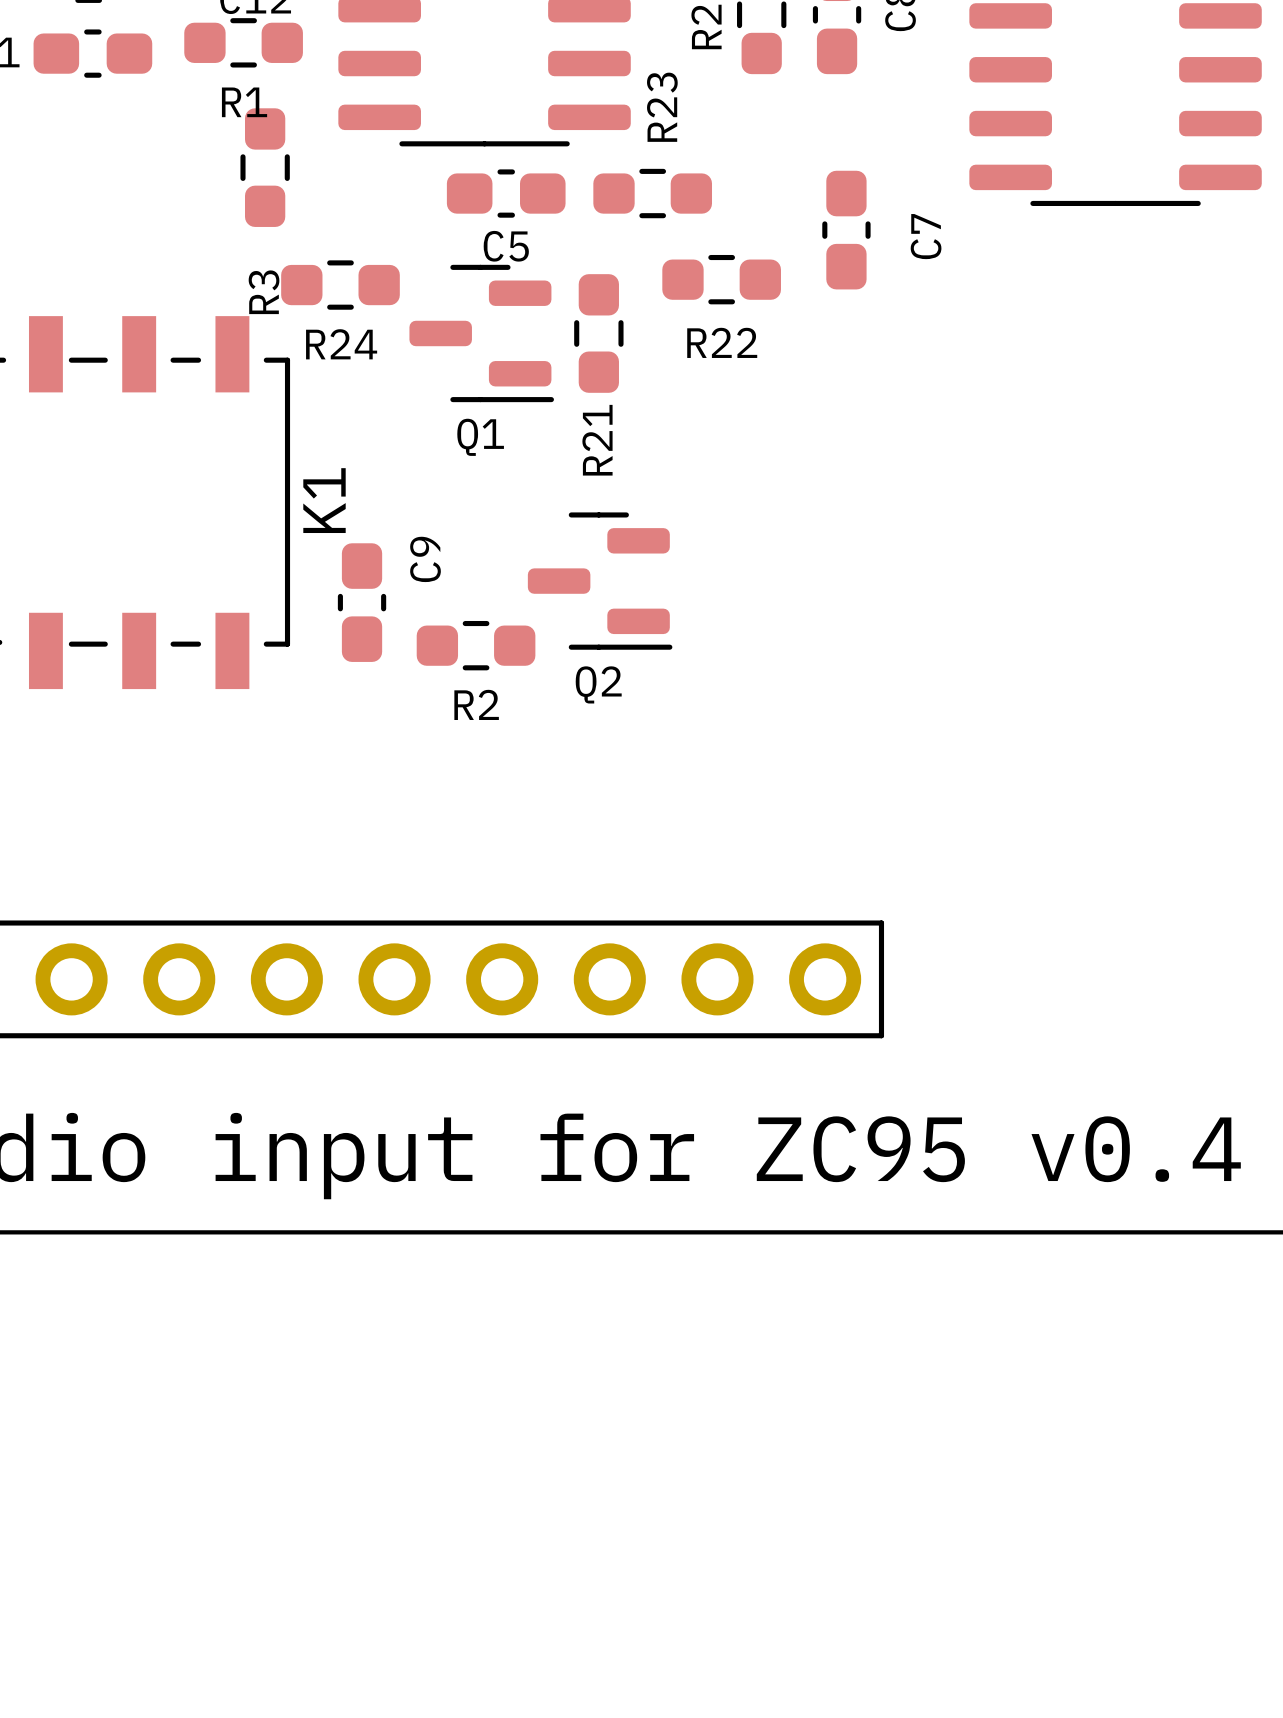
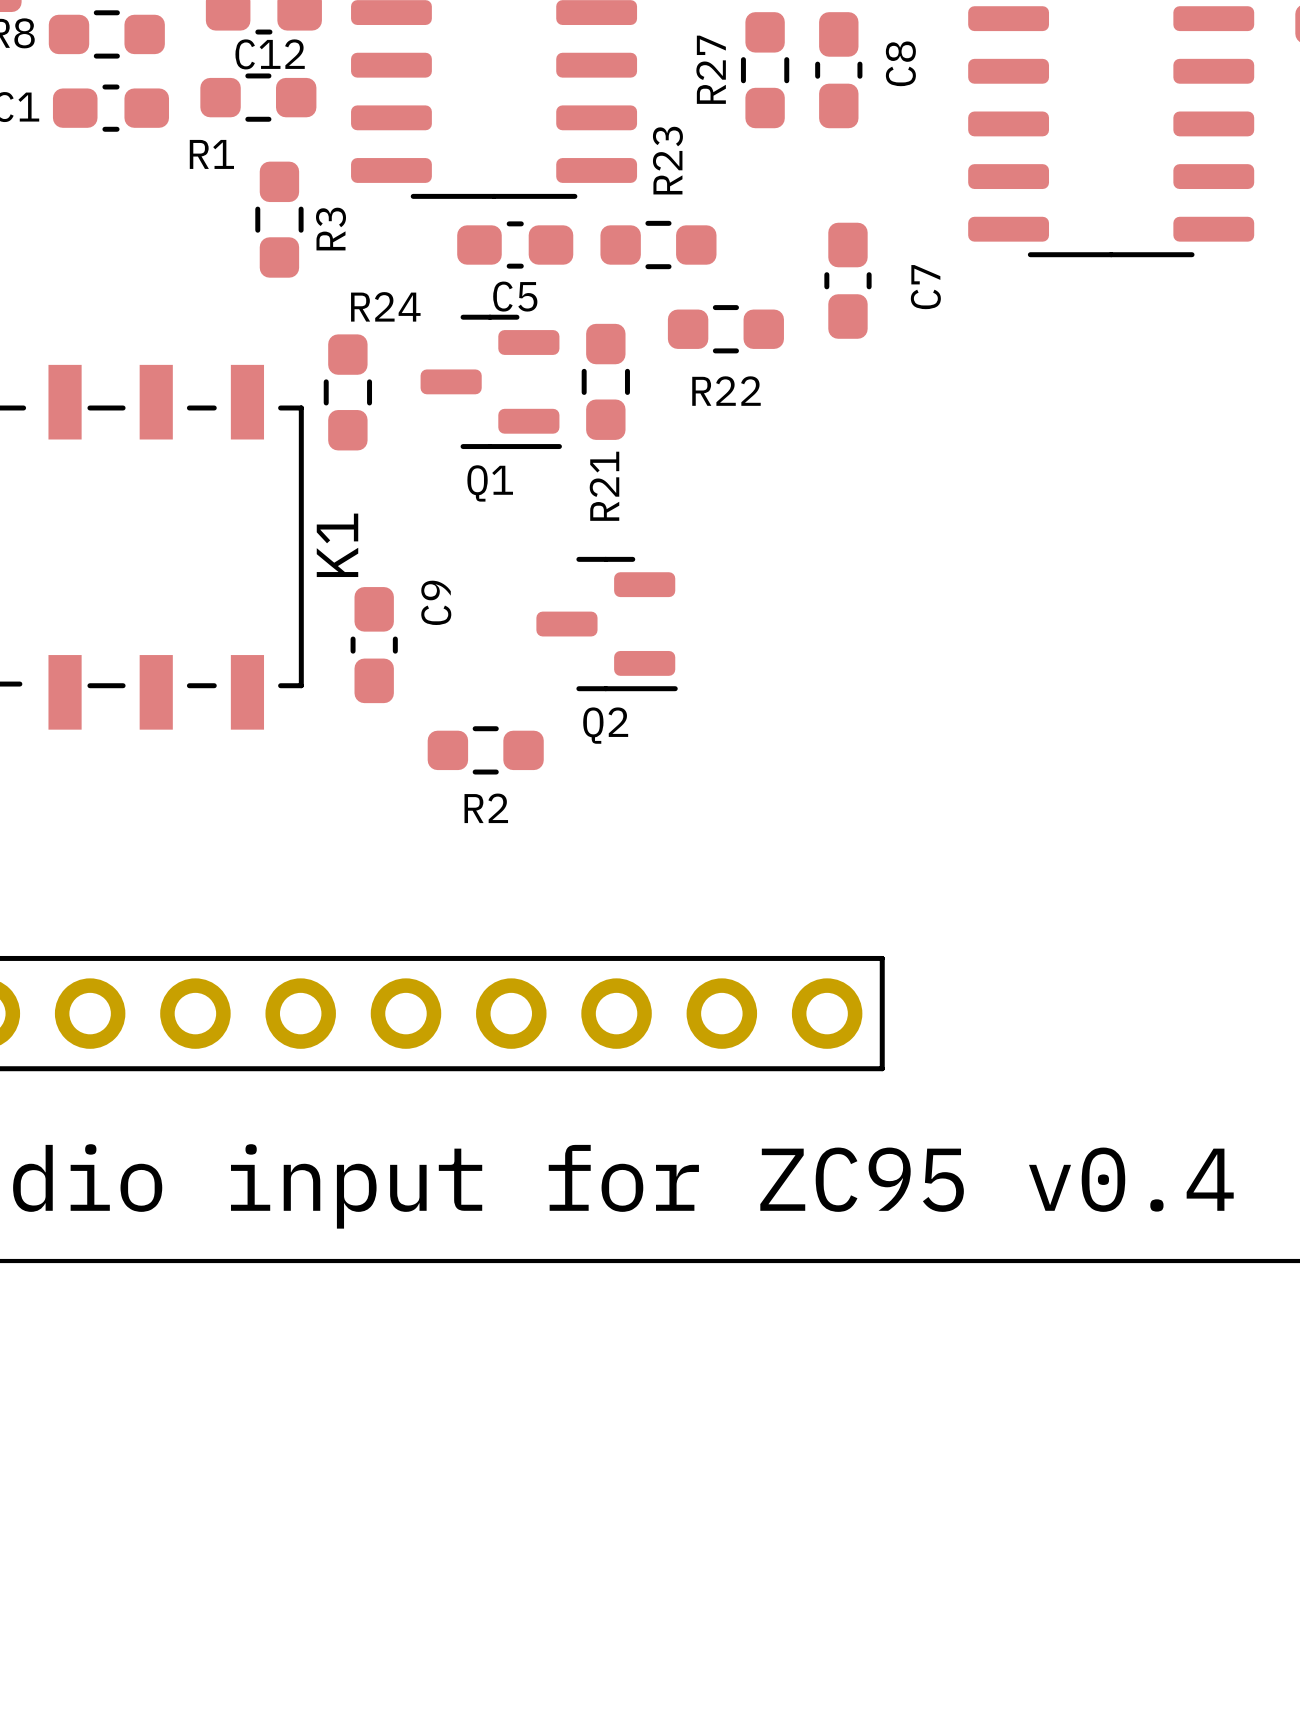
R1 name position: R1 (244, 102) -> R1 (211, 154)
R24 rotation: 0° (340, 285) -> 90° clockwise (347, 392)
R3 name position: R3 (264, 292) -> R3 (330, 229)
R24 name position: R24 (341, 344) -> R24 (385, 306)
R2 position: (476, 645) -> (485, 750)

